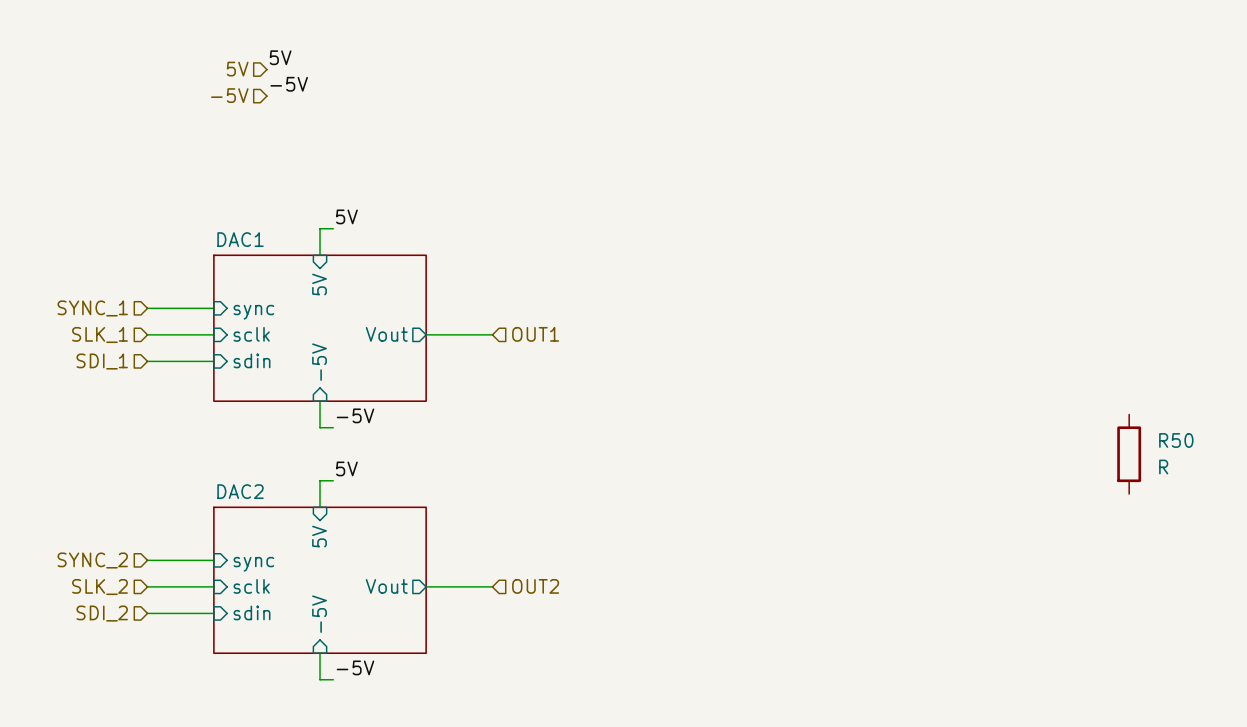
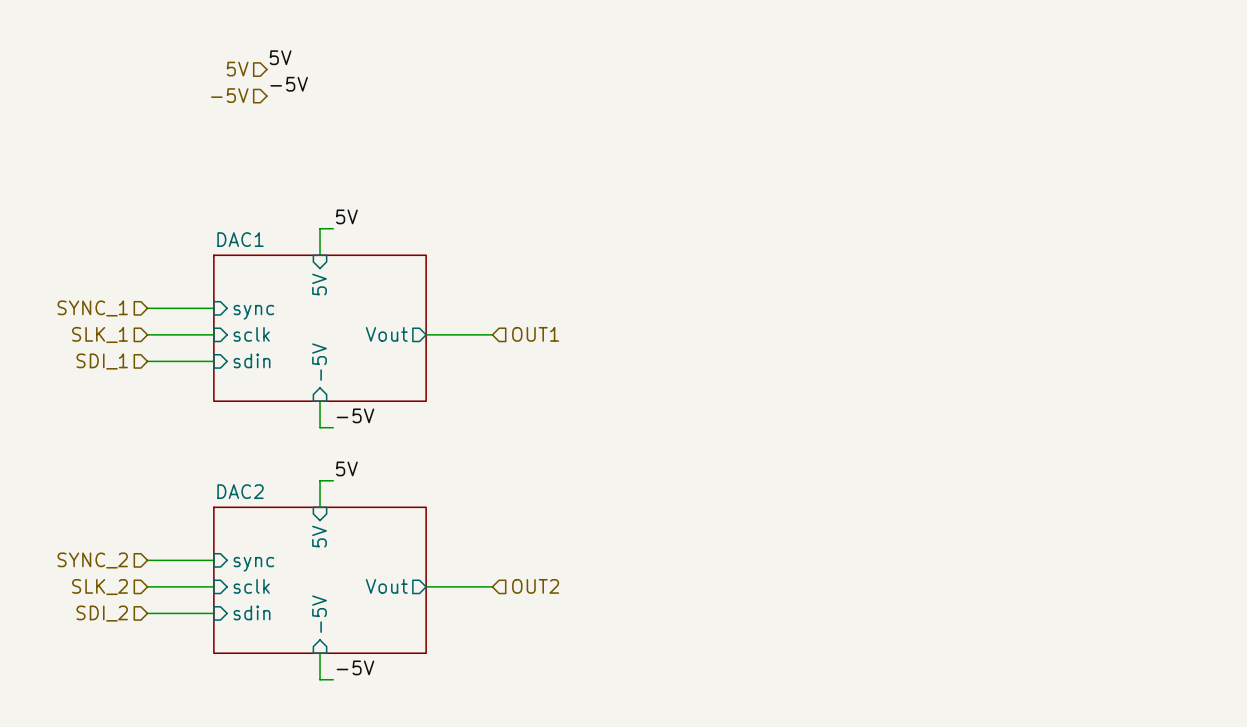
R50: R (1129, 454) -> none

